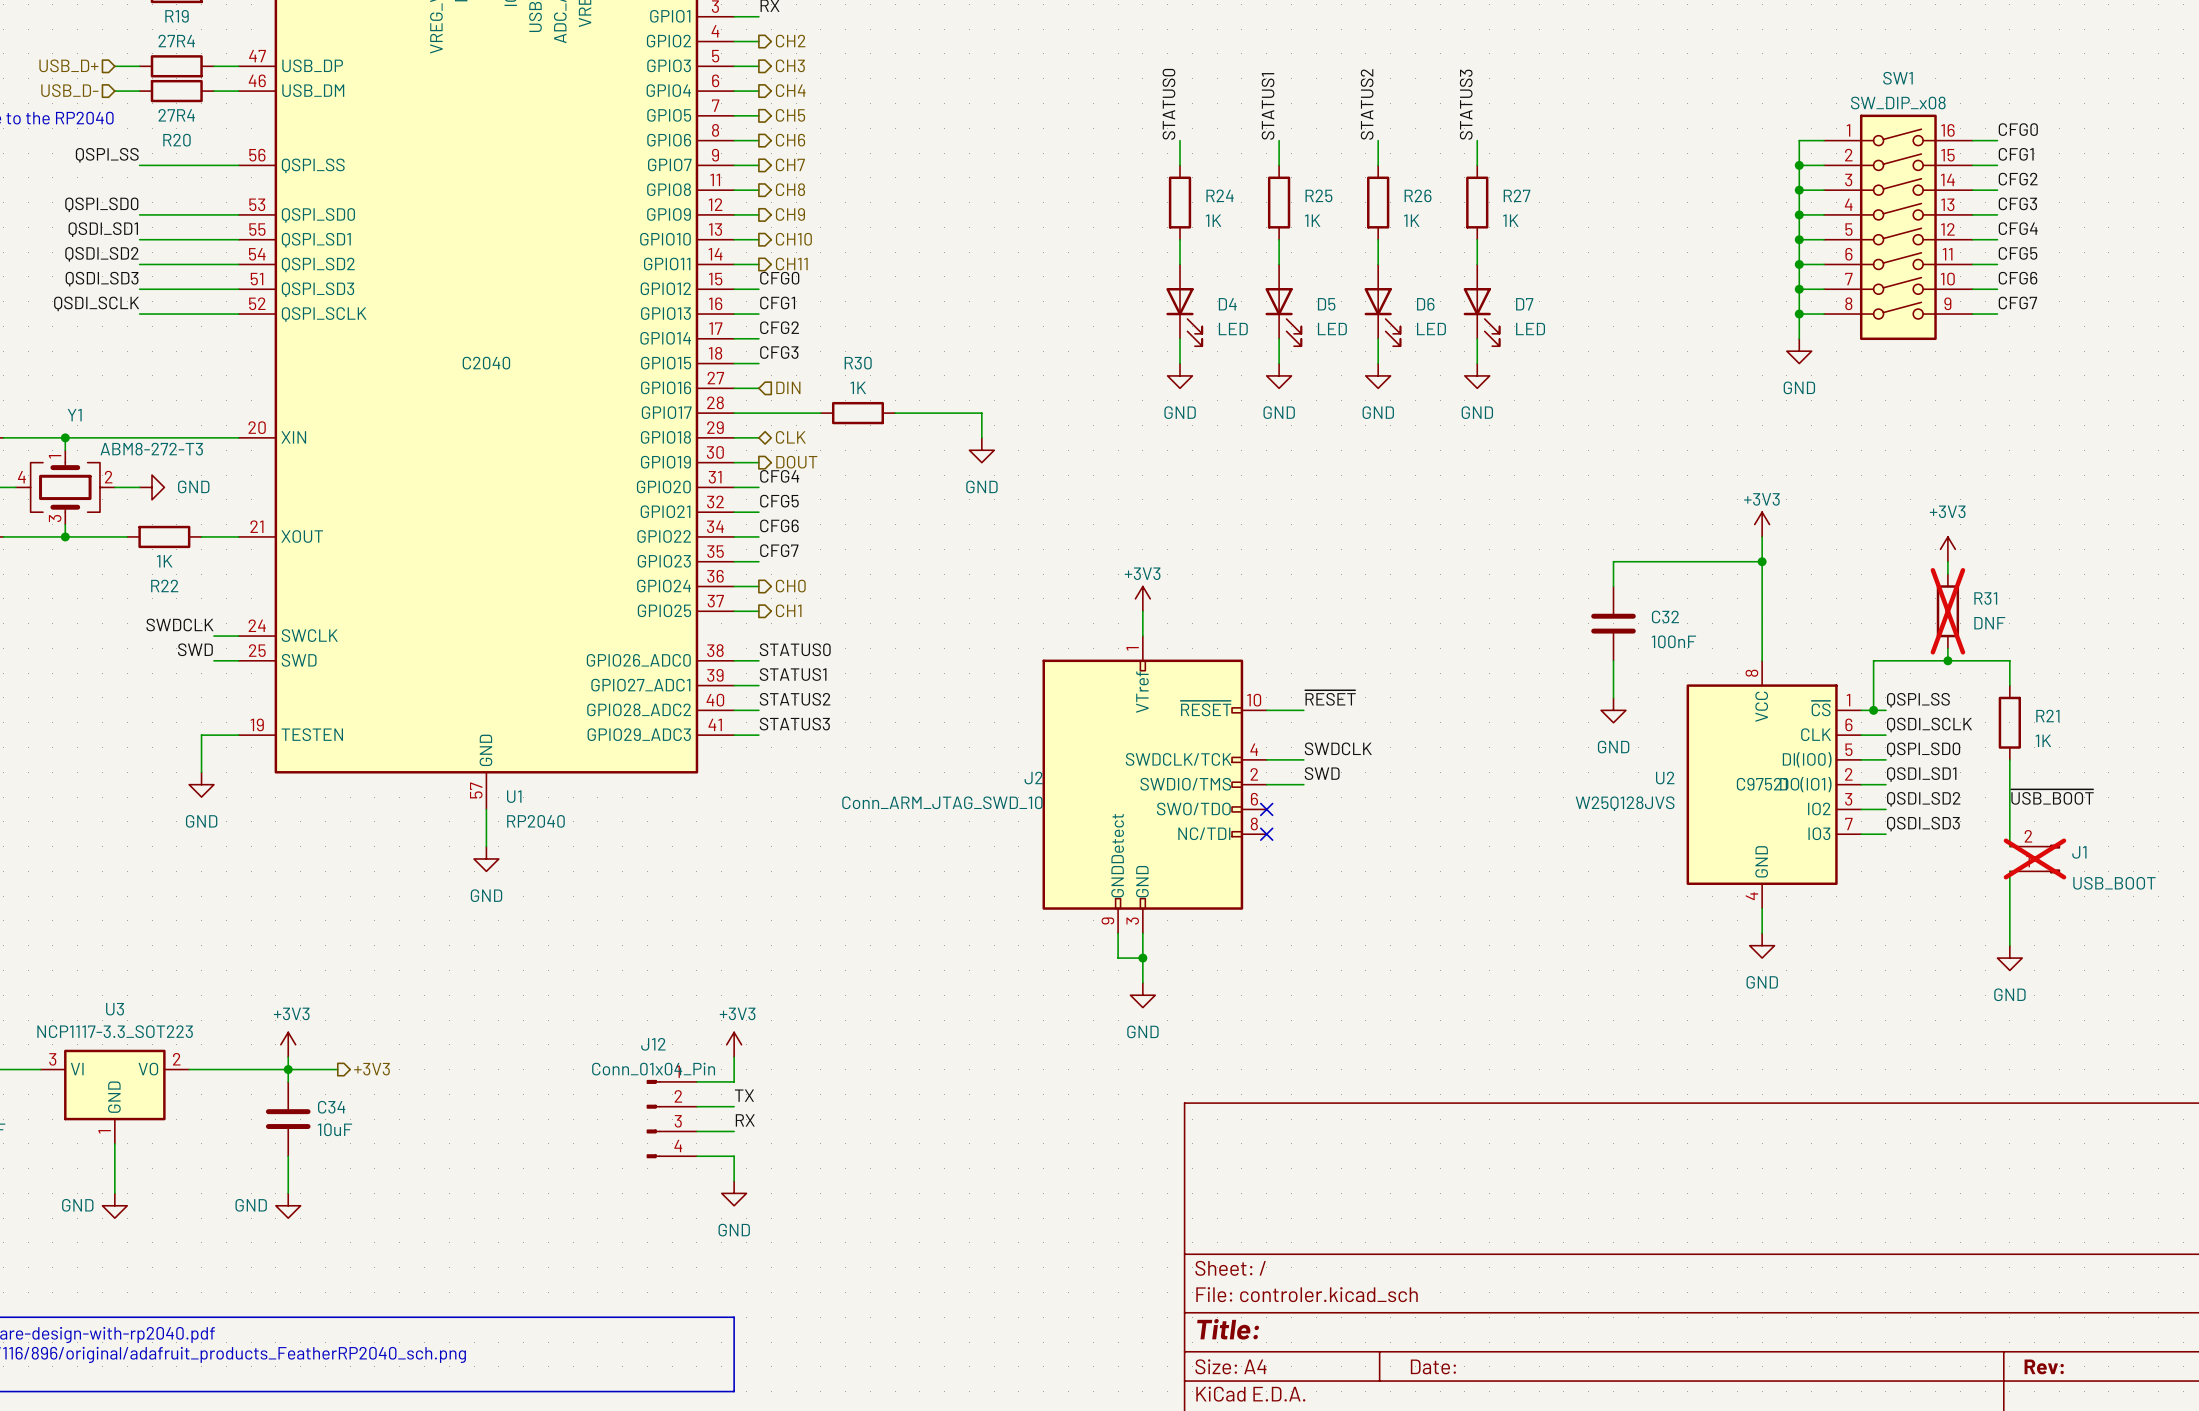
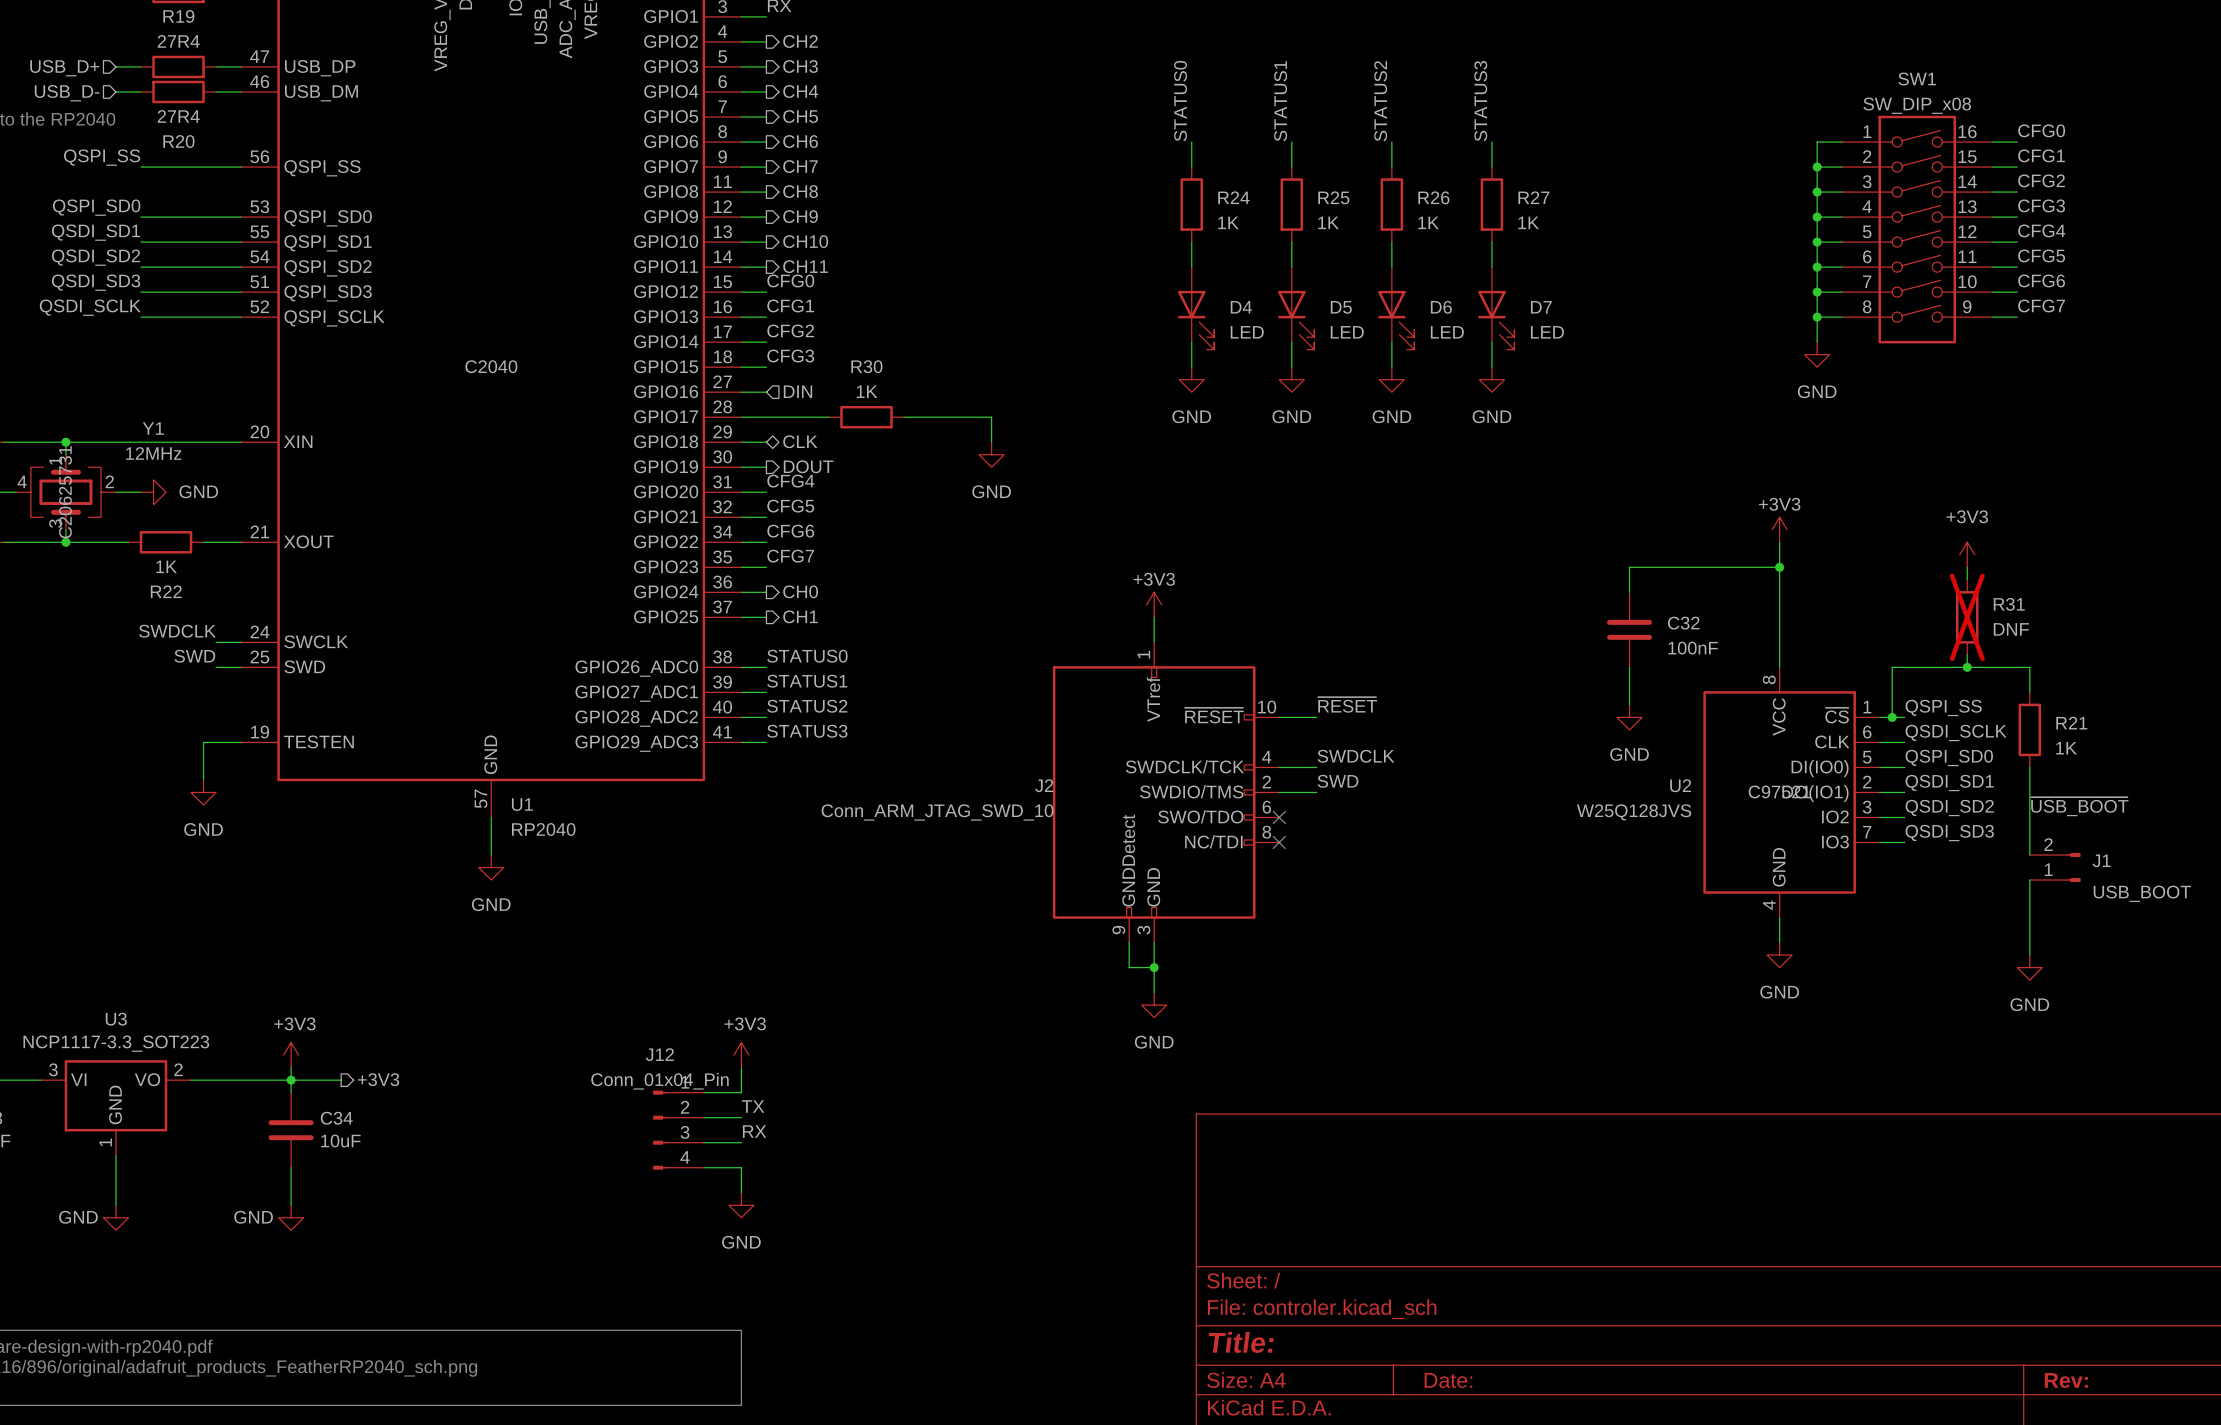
Y1 name position: Y1 (74, 415) -> Y1 (153, 428)
Y1 value: ABM8-272-T3 (151, 449) -> 12MHz (153, 453)
Y1 text: none -> C20625731 (65, 492)
J1 do-not-place cross: (2034, 858) -> none

